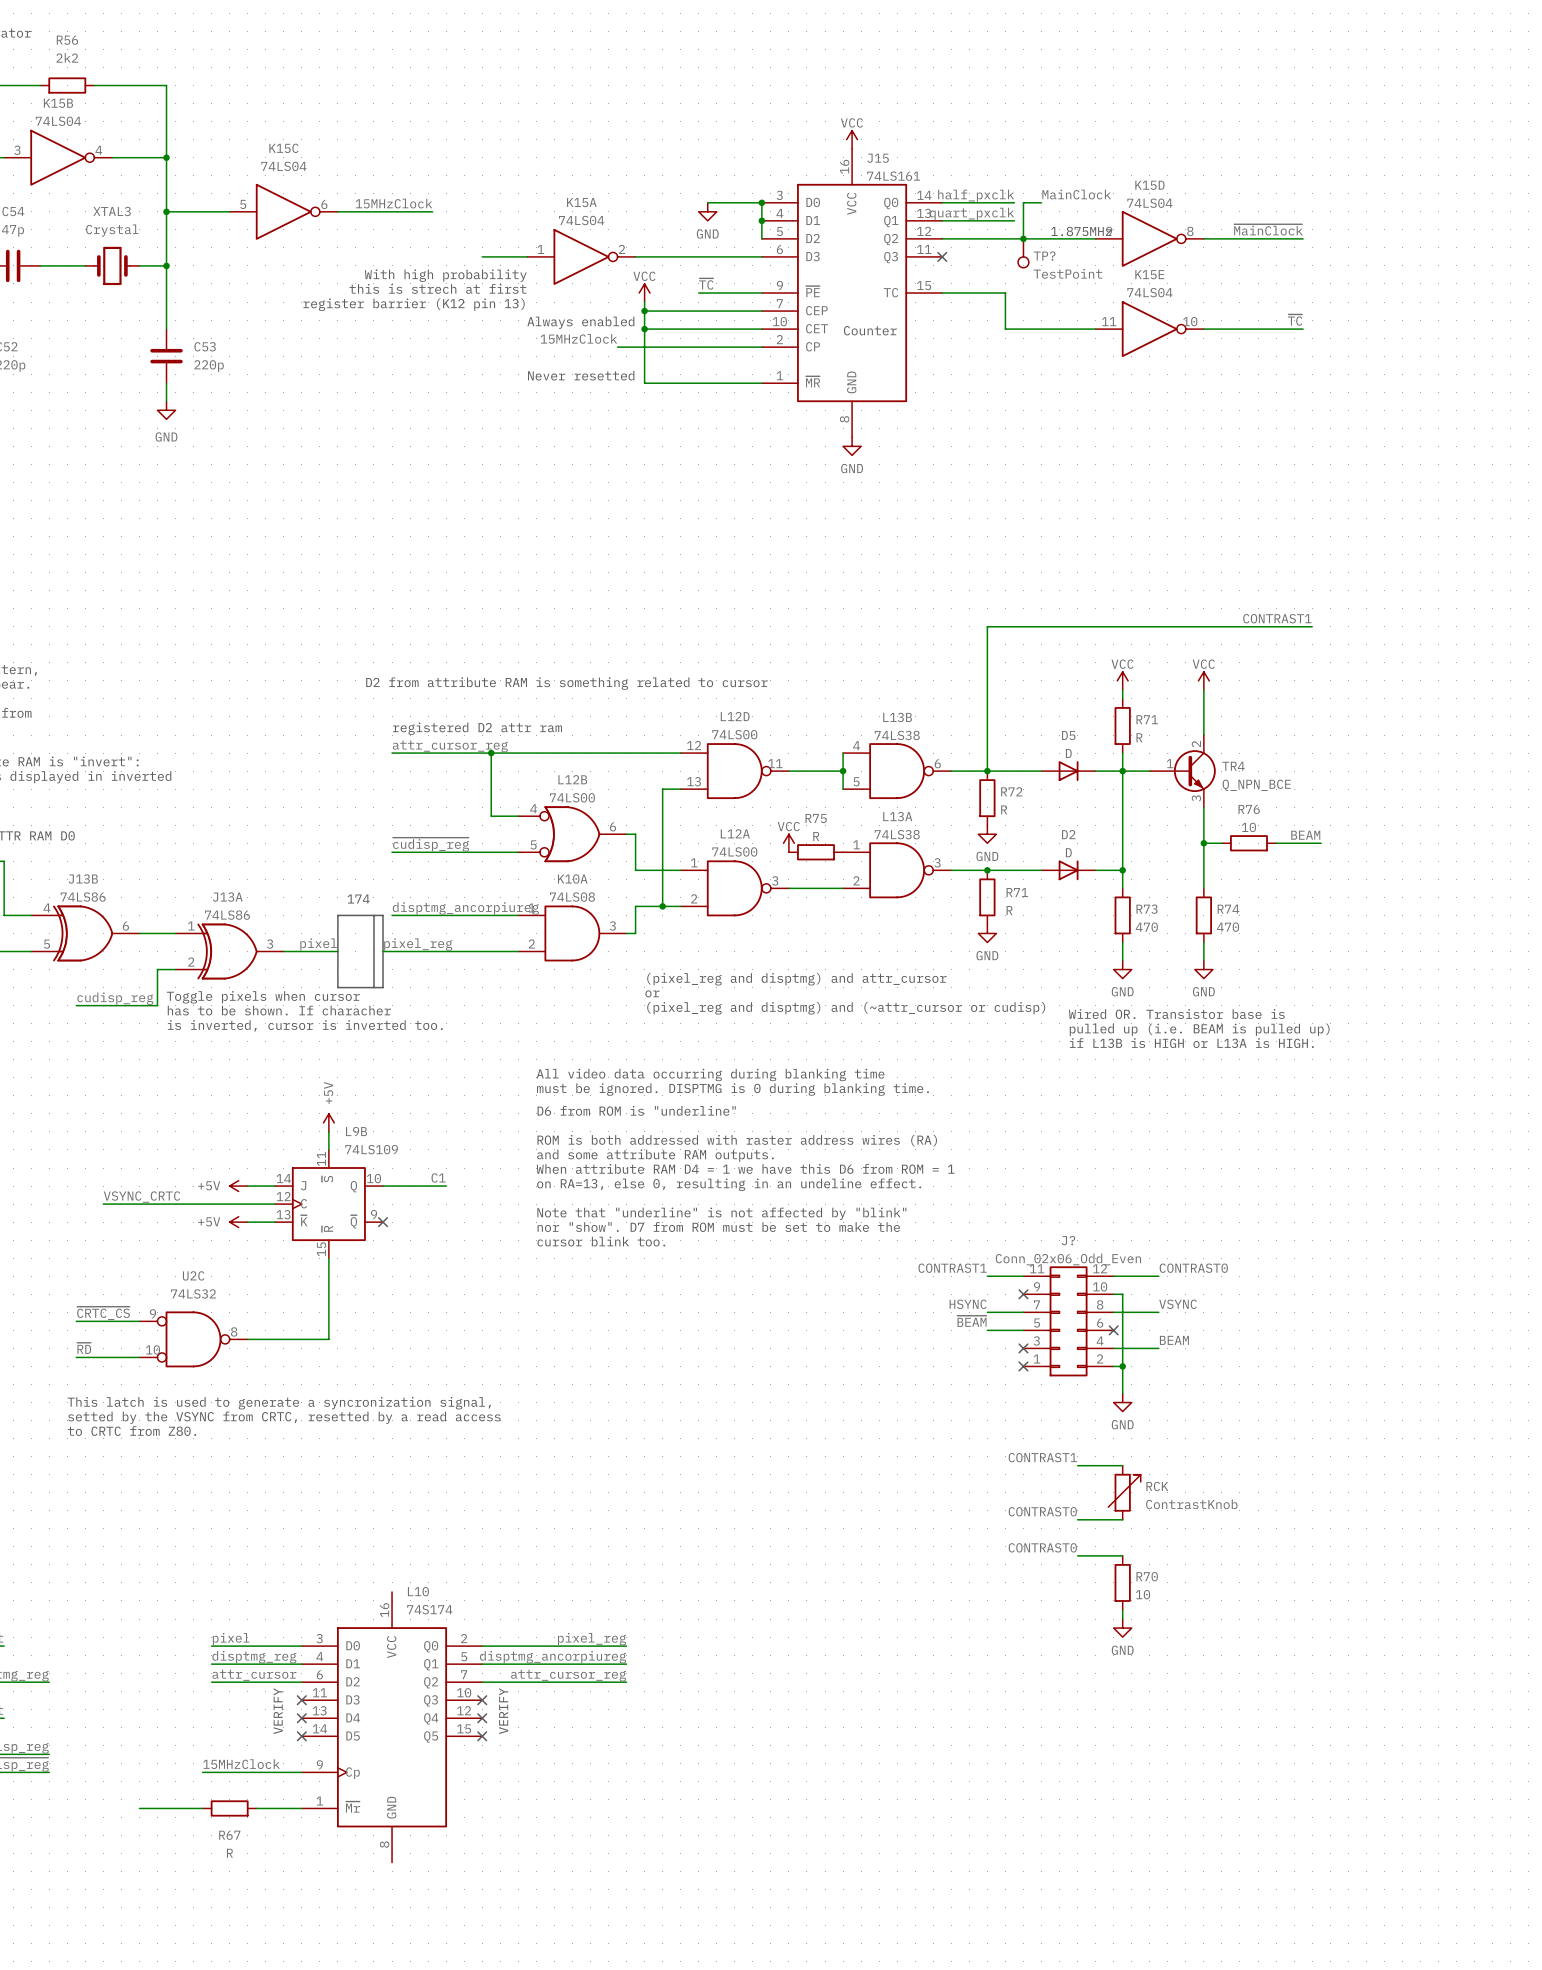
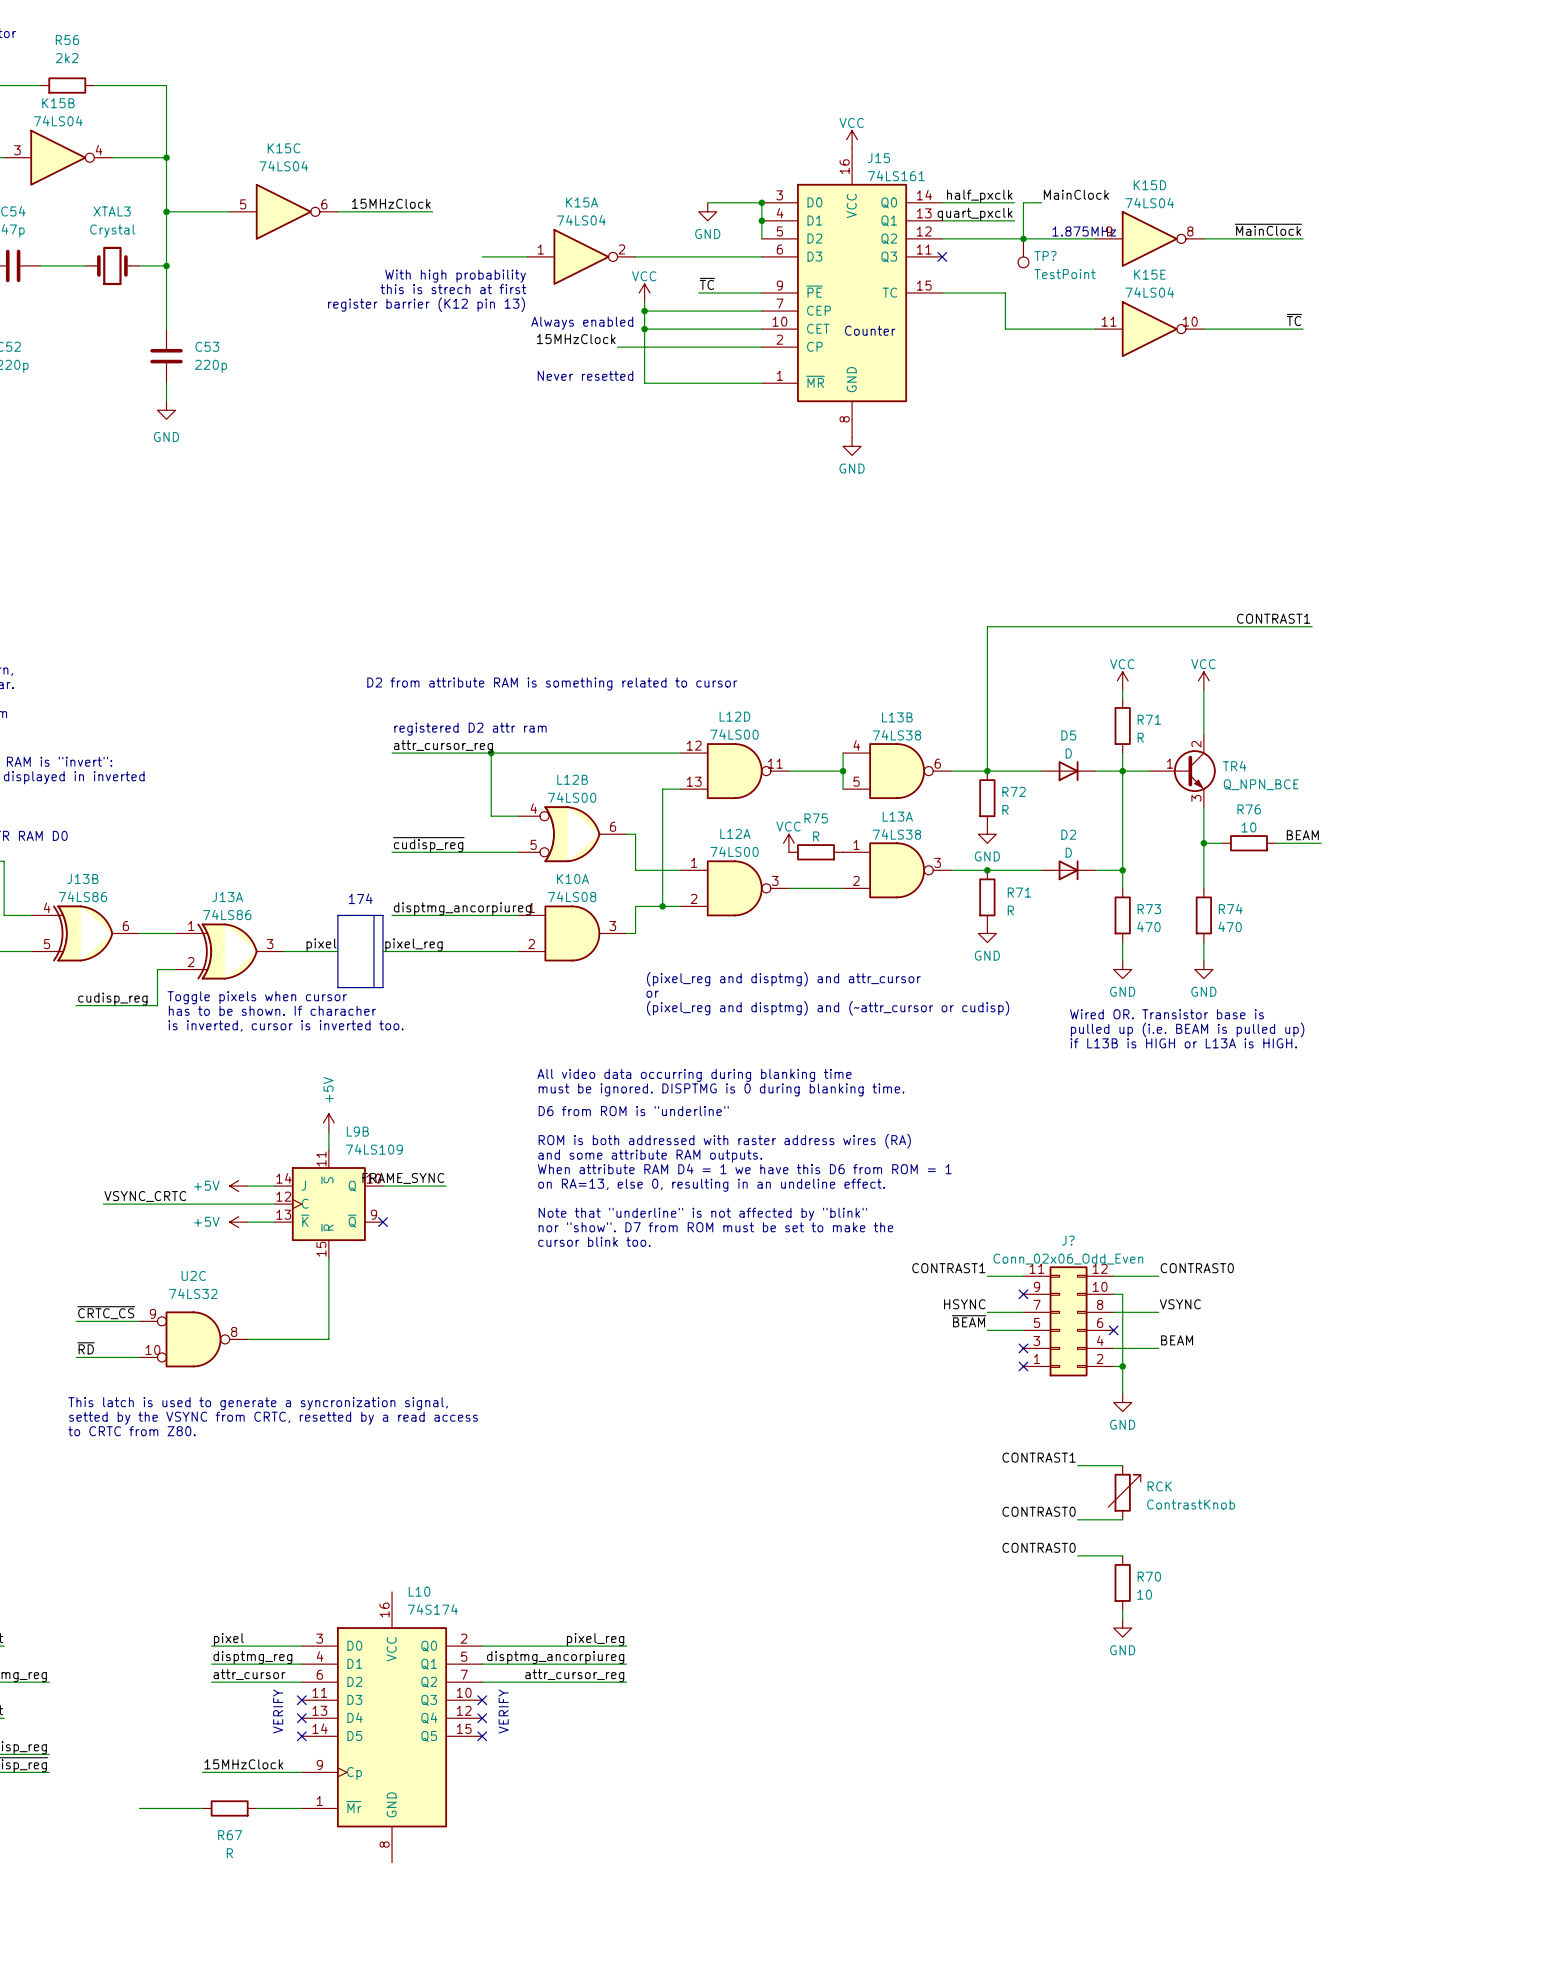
label: C1 (438, 1177) -> FRAME_SYNC (403, 1178)

